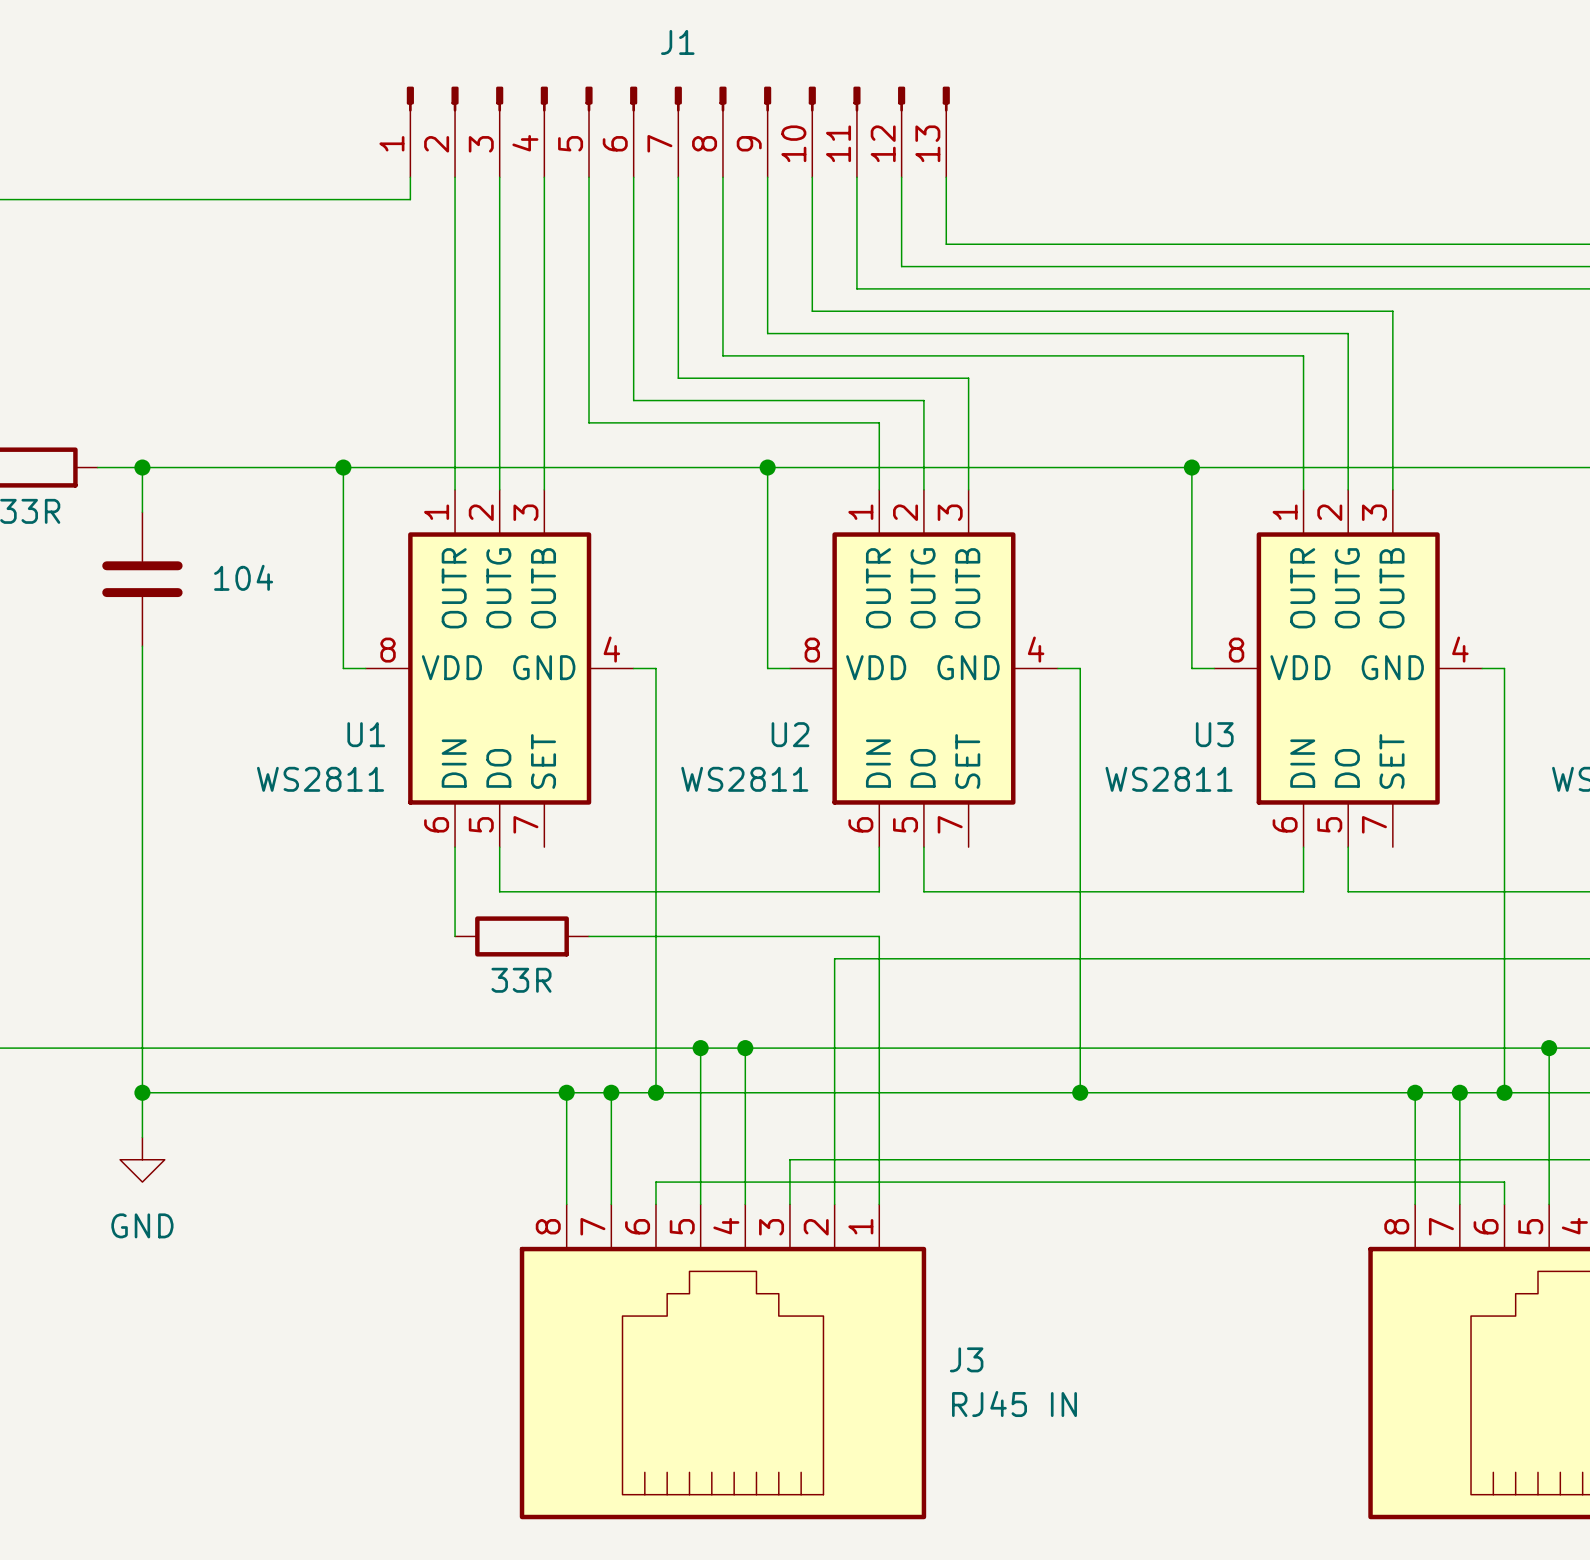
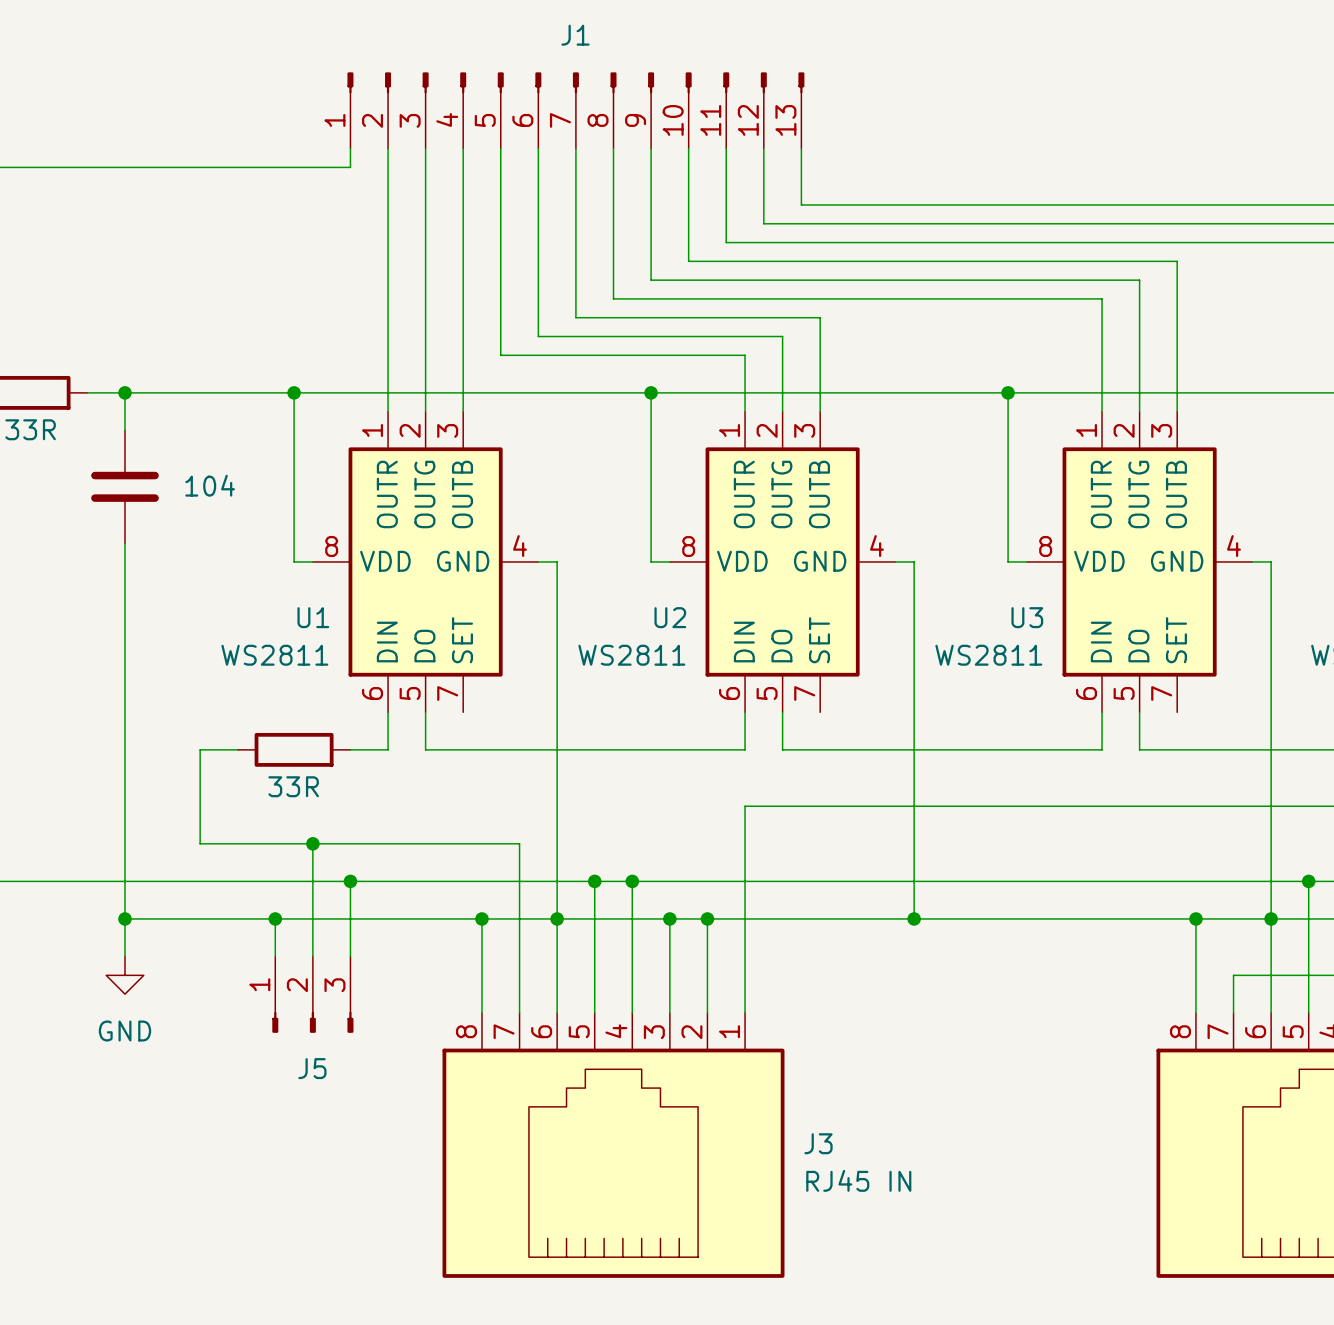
wire: none -> (237, 749) (200, 749) (200, 843) (519, 843) (519, 918)
wire: (455, 891) (455, 936) -> (388, 749) (350, 749)
part position: (522, 936) -> (294, 749)
wire: (589, 936) (879, 936) (879, 958) (834, 958) (834, 1092) -> none
wire: none -> (312, 843) (312, 956)
junction: none -> (312, 843)
wire: none -> (350, 881) (350, 956)
junction: none -> (350, 881)
wire: none -> (275, 918) (275, 956)
junction: none -> (275, 918)
junction: (611, 1092) -> none
junction: none -> (669, 918)
junction: none -> (707, 918)
wire: (1459, 1092) (1459, 1159) (789, 1159) -> (669, 918) (669, 975)
junction: (1459, 1092) -> none
wire: none -> (1271, 918) (1271, 994)
J5: none -> (312, 994)
wire: (655, 1182) (1504, 1182) -> (557, 994) (557, 918)

